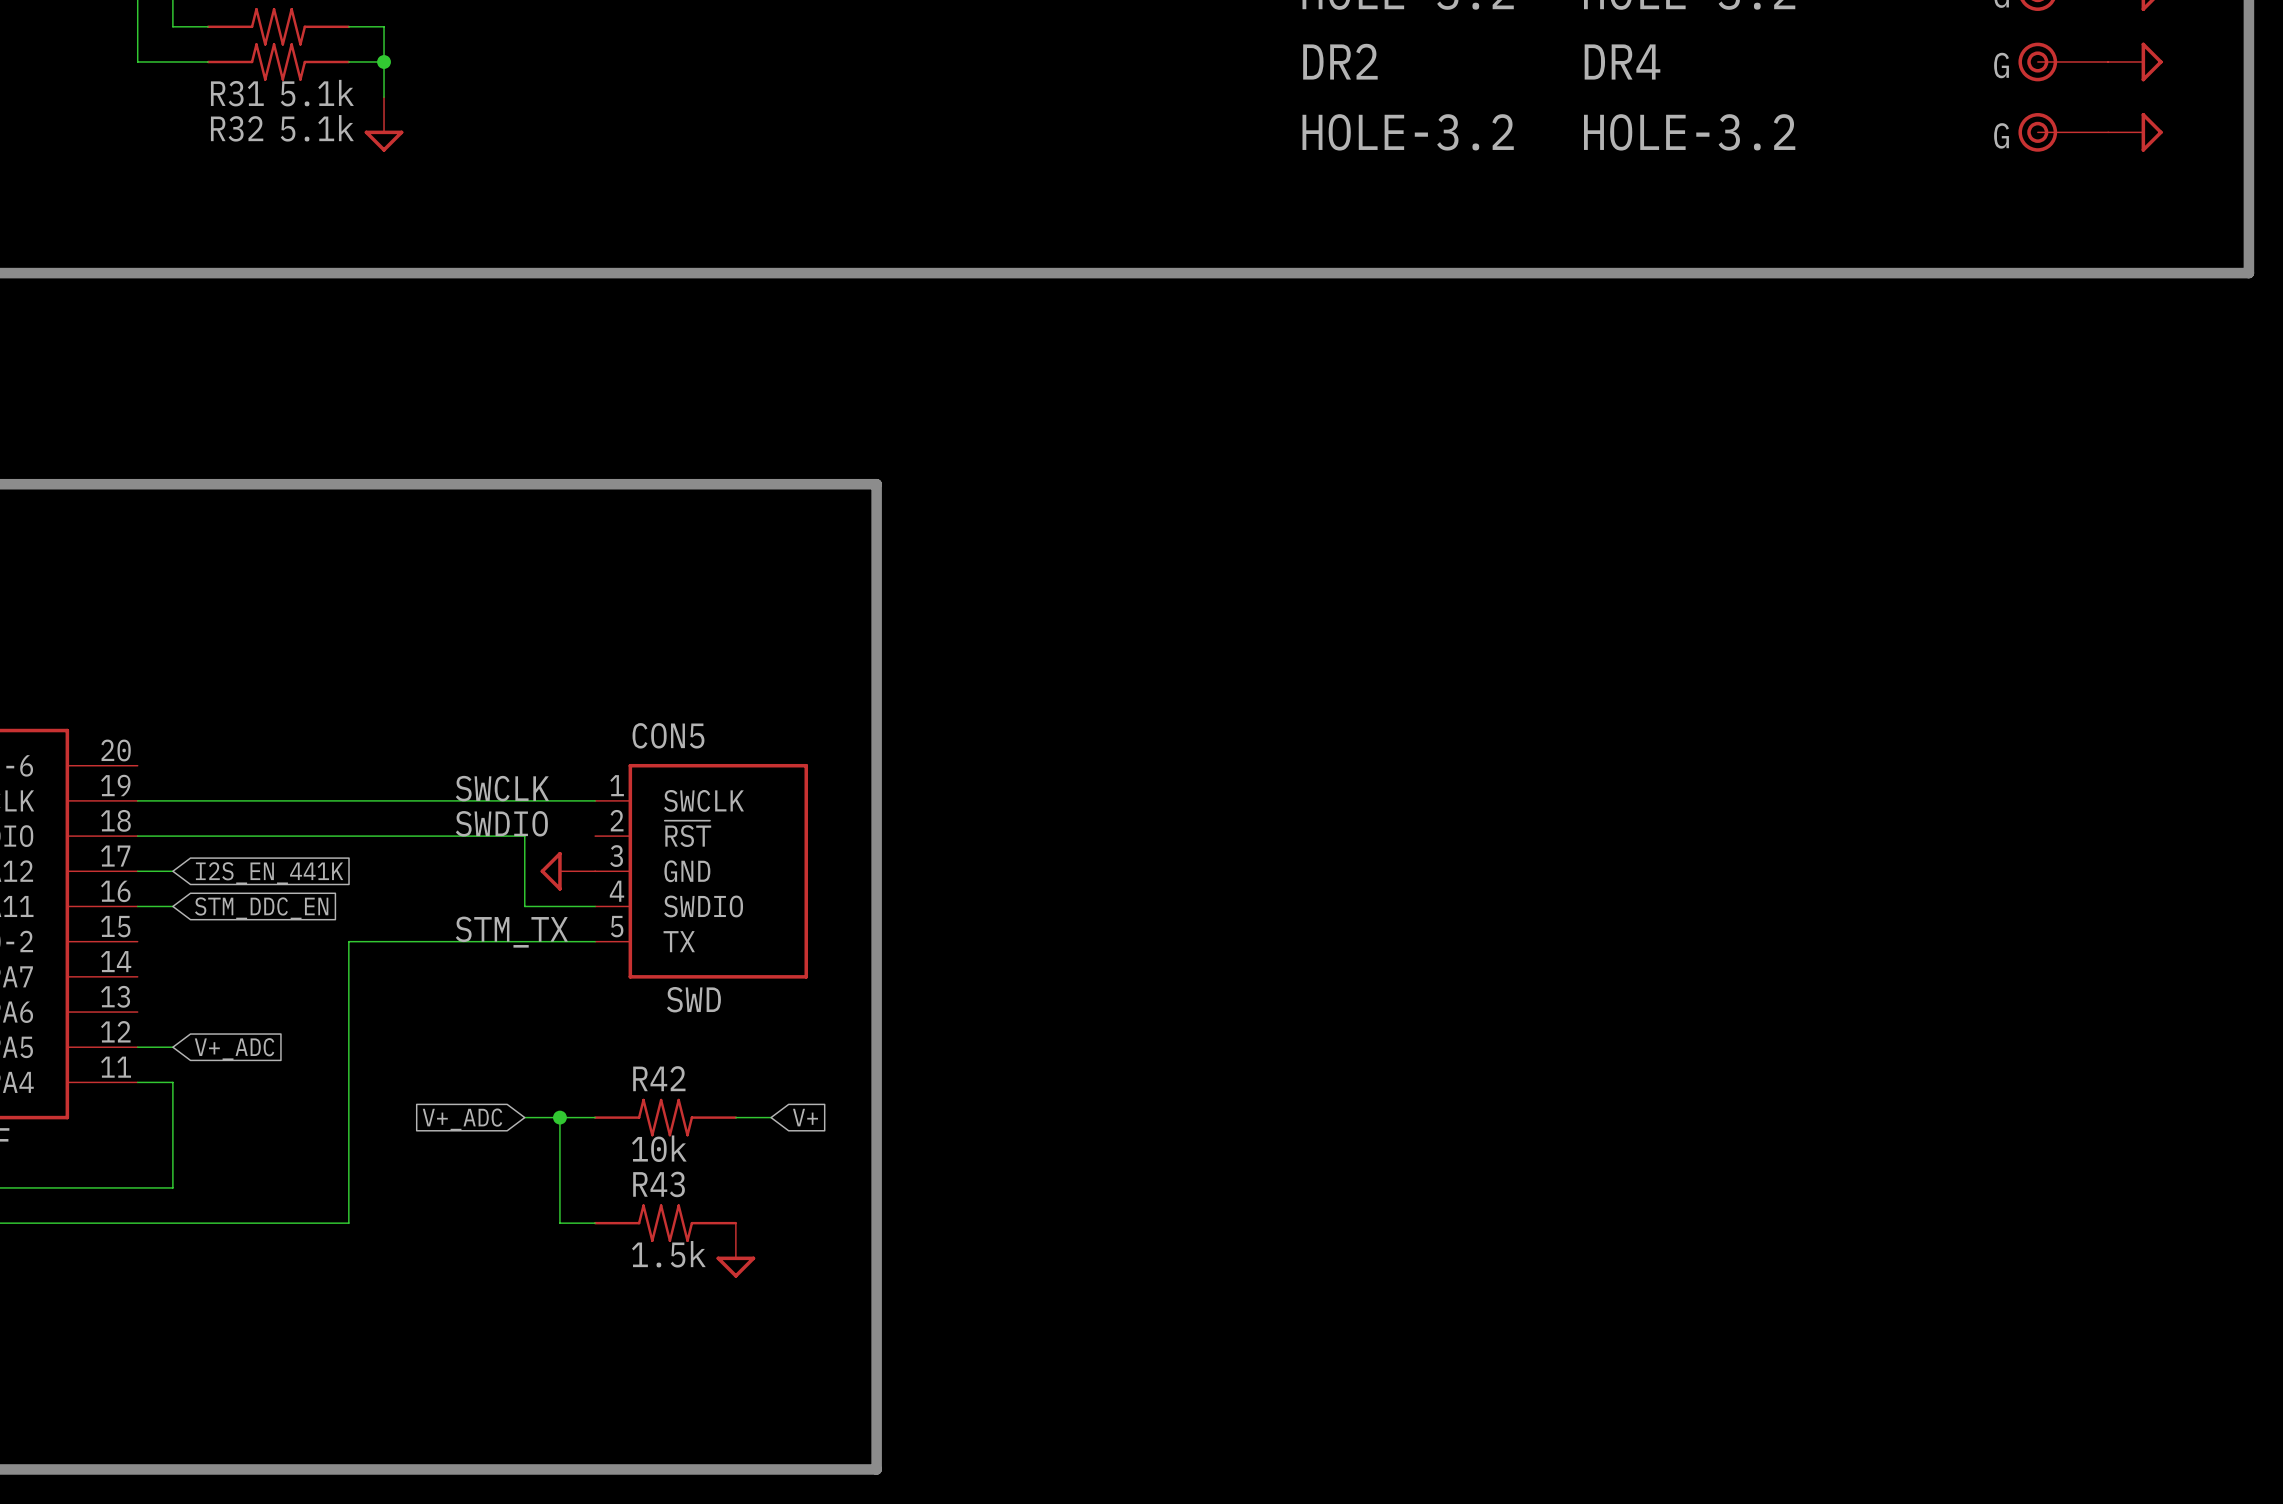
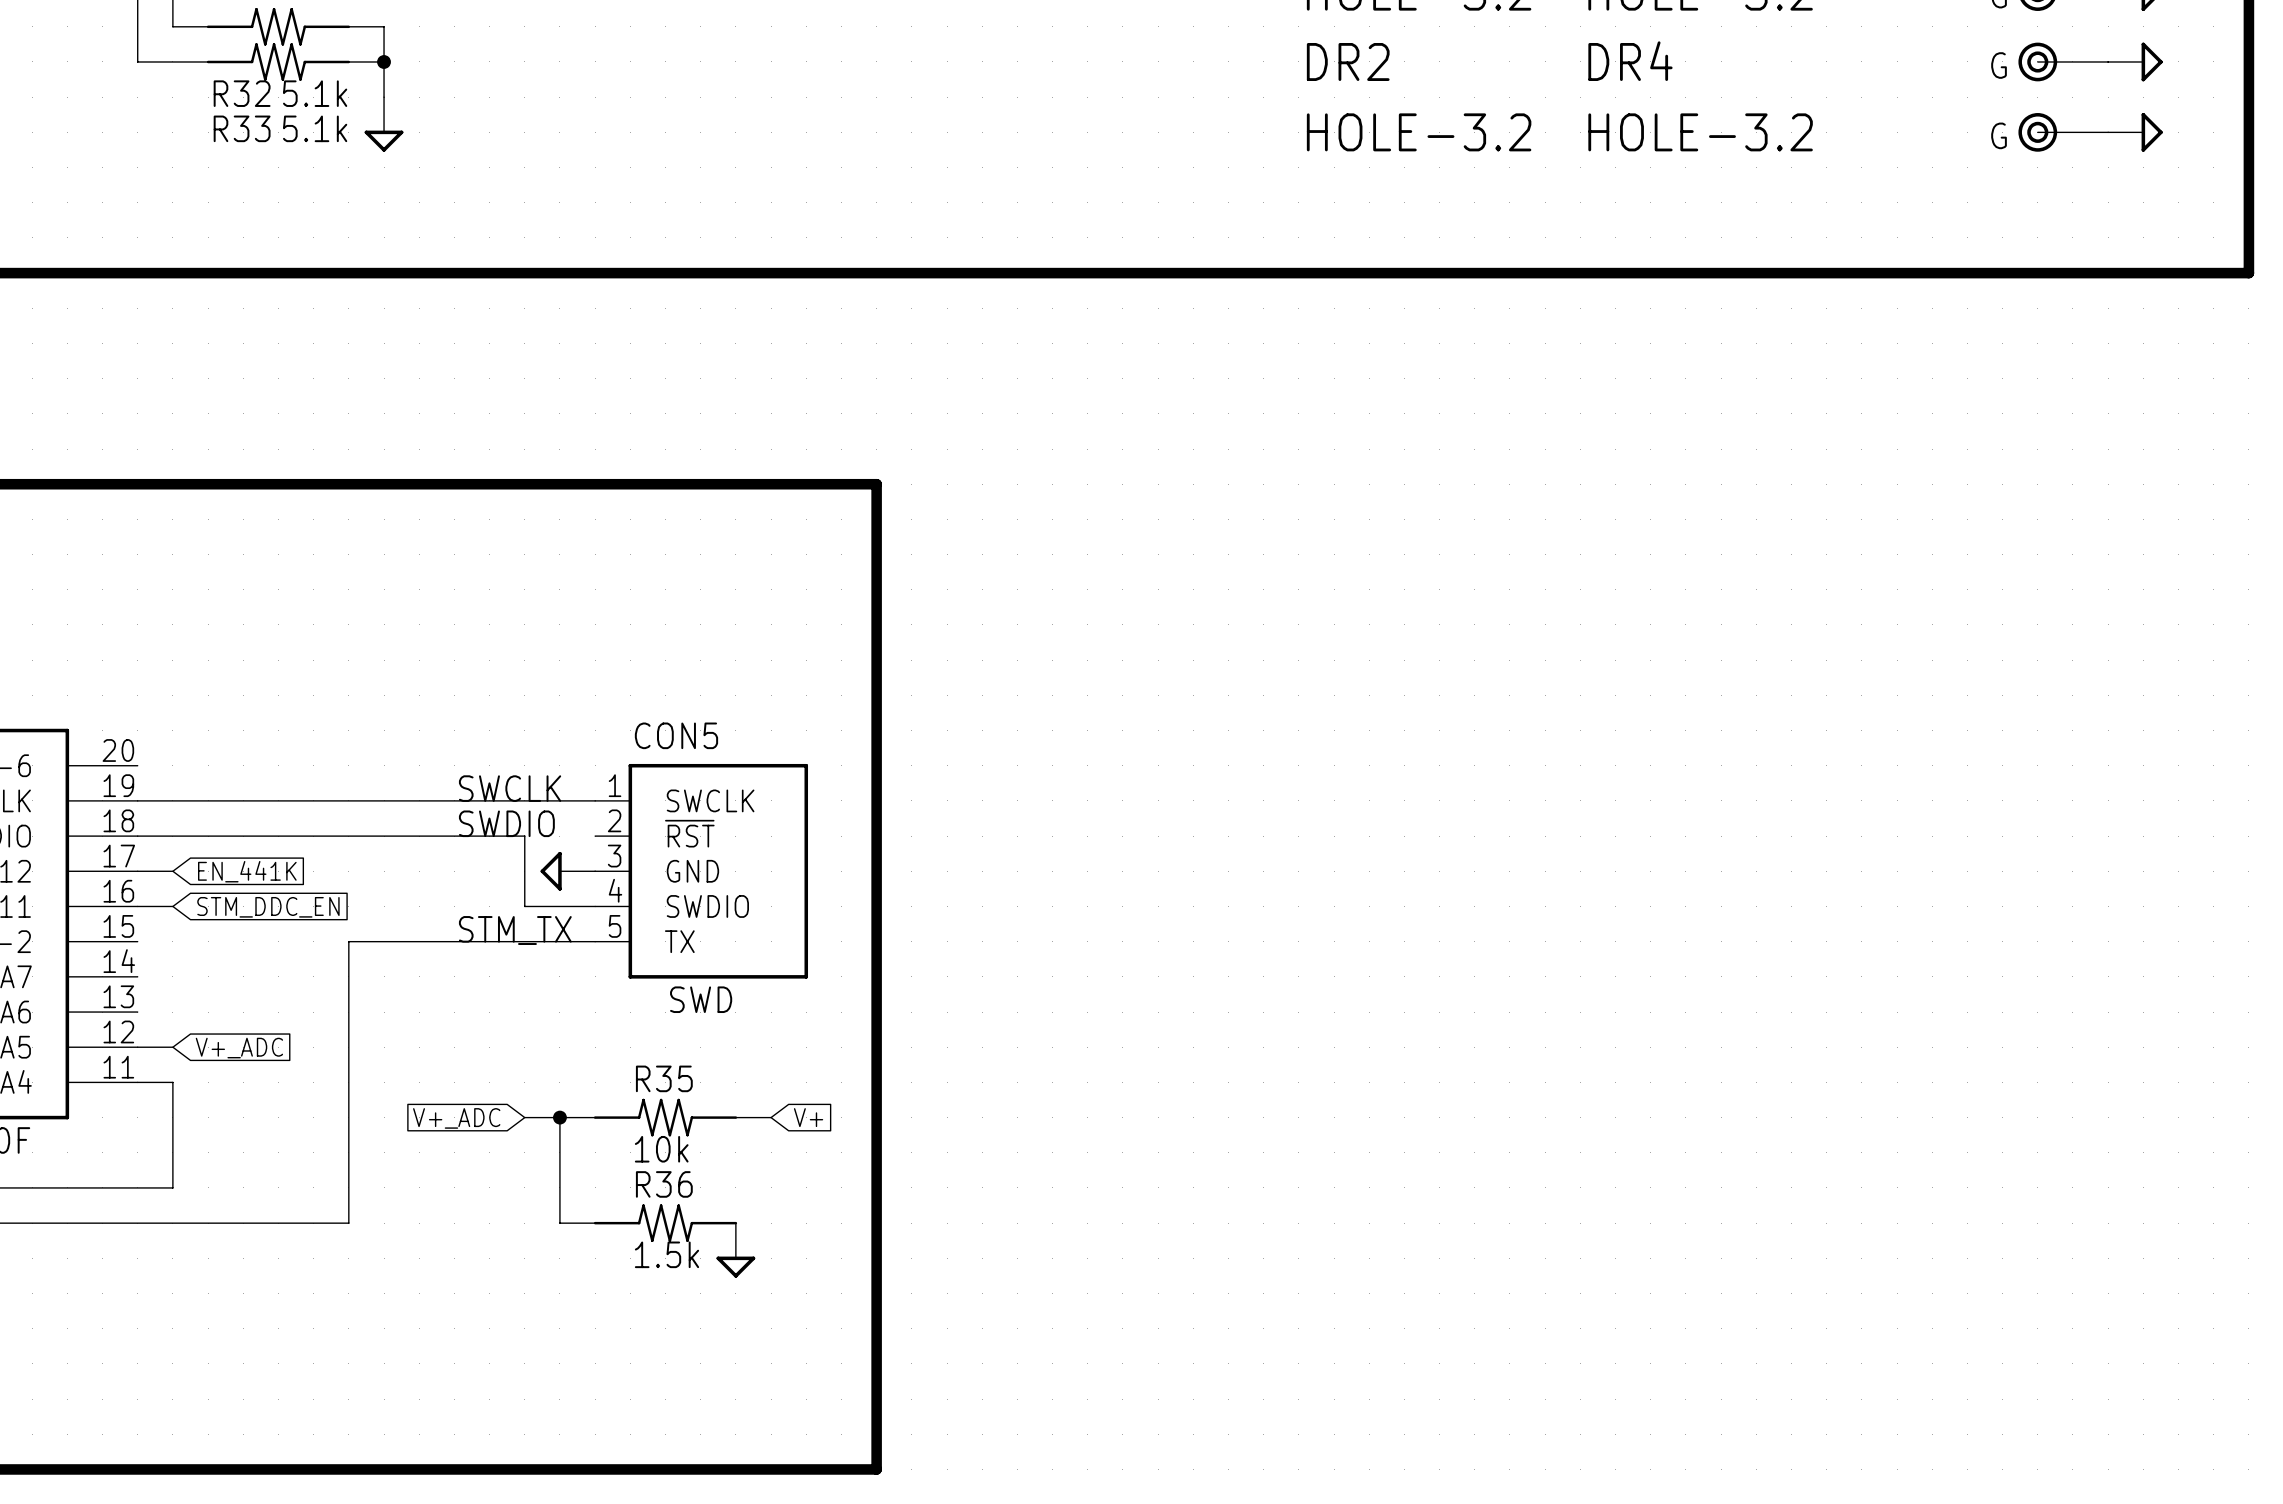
R31 name: R31 (237, 93) -> R32 (242, 93)
R32 name: R32 (237, 128) -> R33 (242, 128)
global label: I2S_EN_441K (269, 873) -> EN_441K (247, 871)
R42 name: R42 (659, 1078) -> R35 (664, 1078)
R43 name: R43 (659, 1184) -> R36 (664, 1184)

